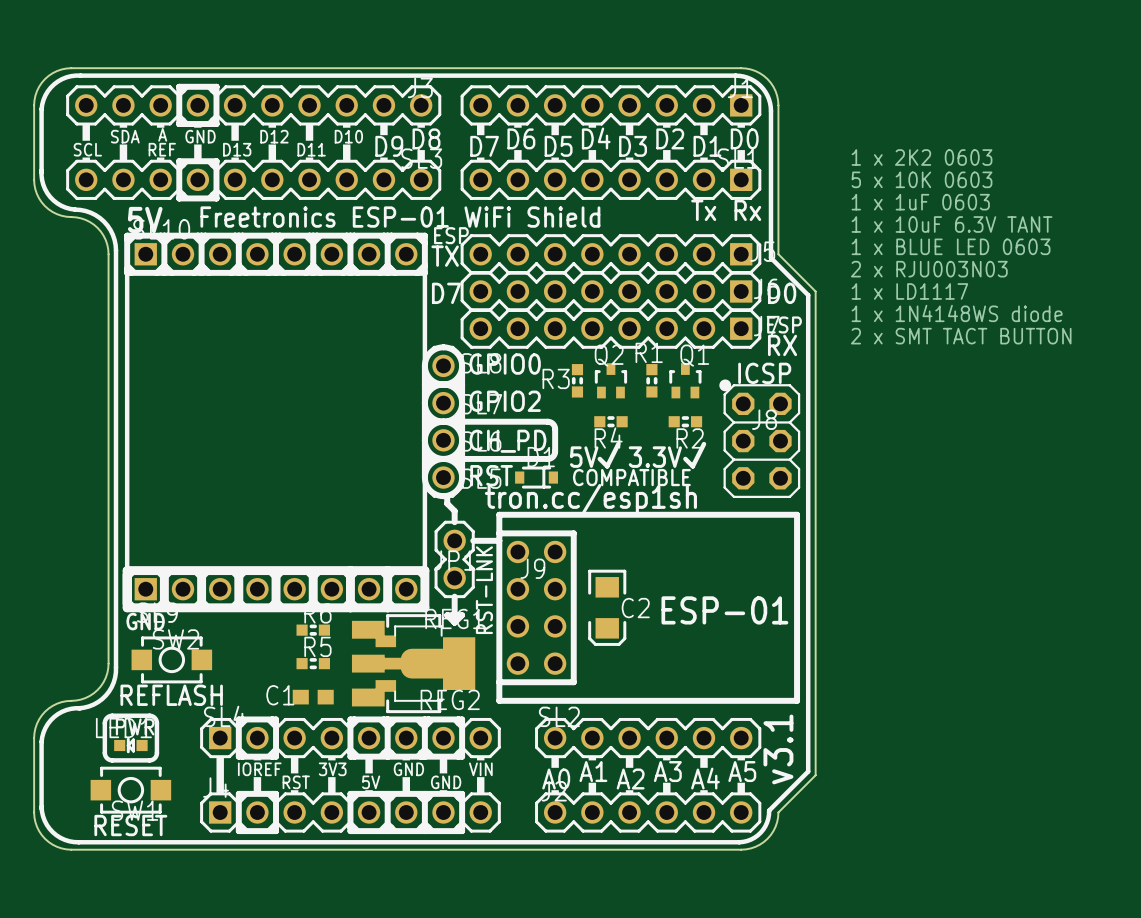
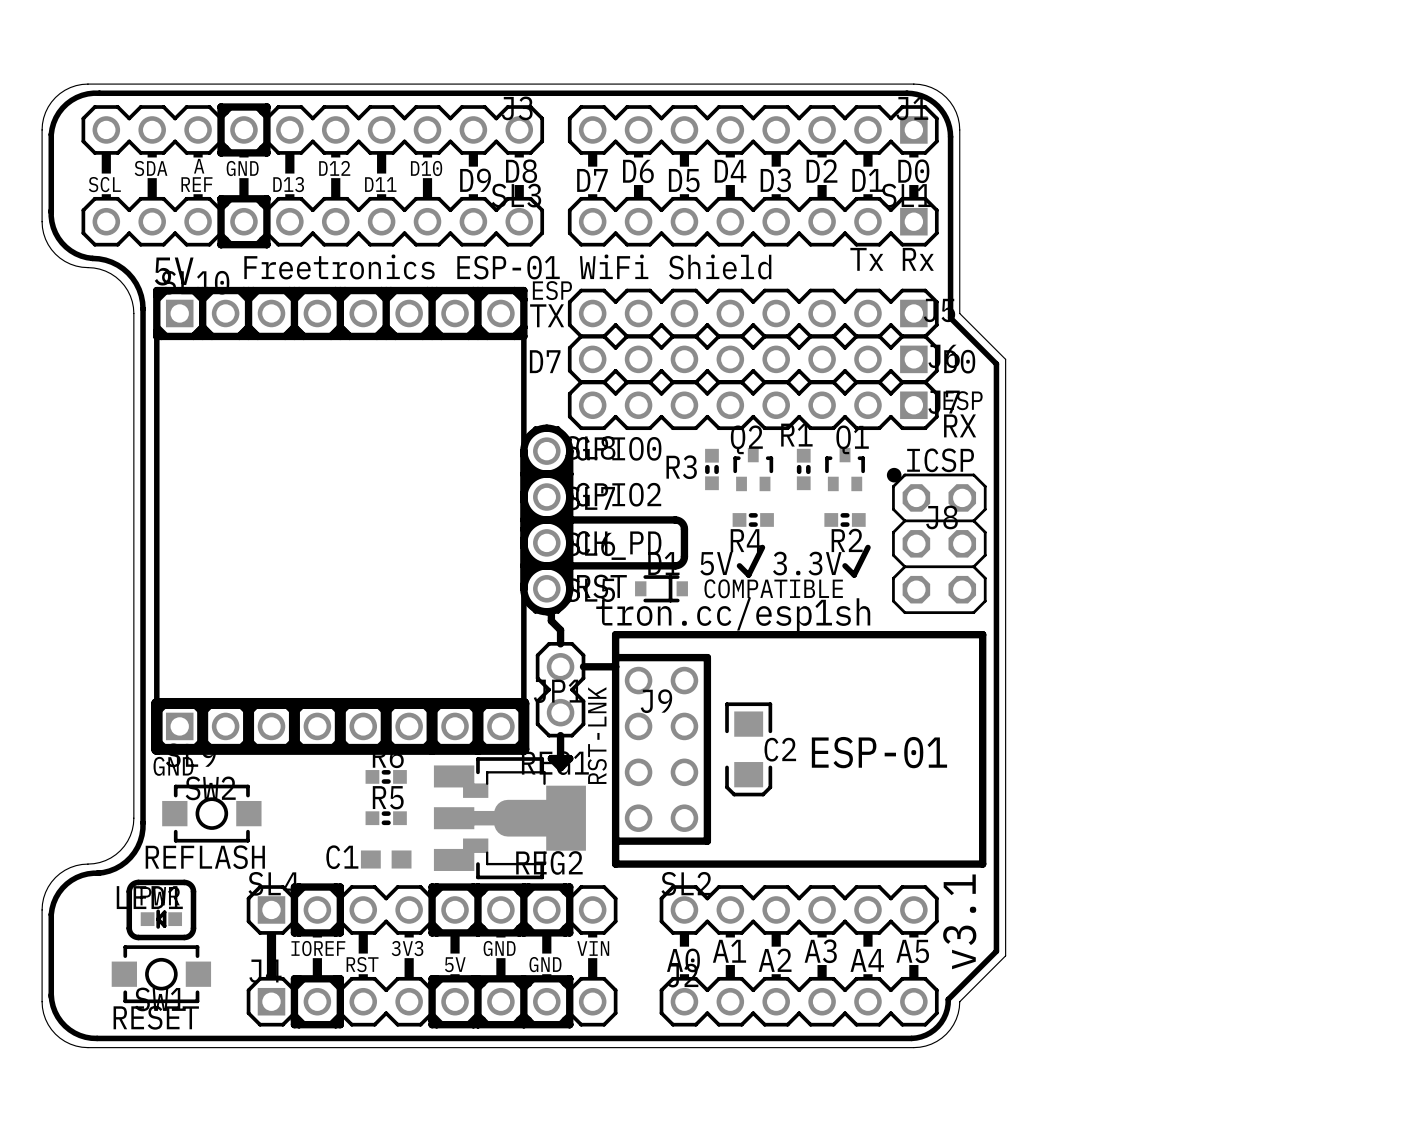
text: 1 x 2K2 0603 (922, 157) -> none
text: 5 x 10K 0603 (922, 179) -> none
text: 1 x 1uF 0603 (920, 202) -> none
text: 1 x 10uF 6.3V TANT (952, 224) -> none
text: 1 x BLUE LED 0603 (951, 246) -> none
text: 2 x RJU003N03 (929, 269) -> none
text: 1 x LD1117 (909, 291) -> none
text: 1 x 1N4148WS diode (957, 313) -> none
text: 2 x SMT TACT BUTTON (961, 336) -> none

